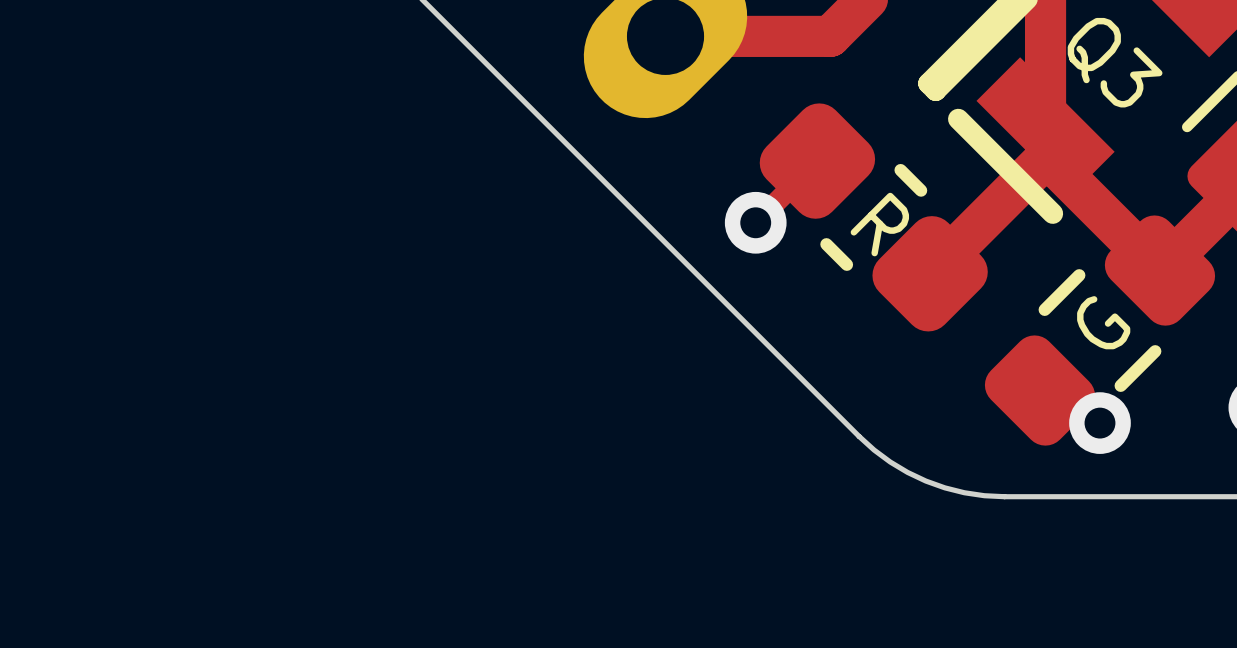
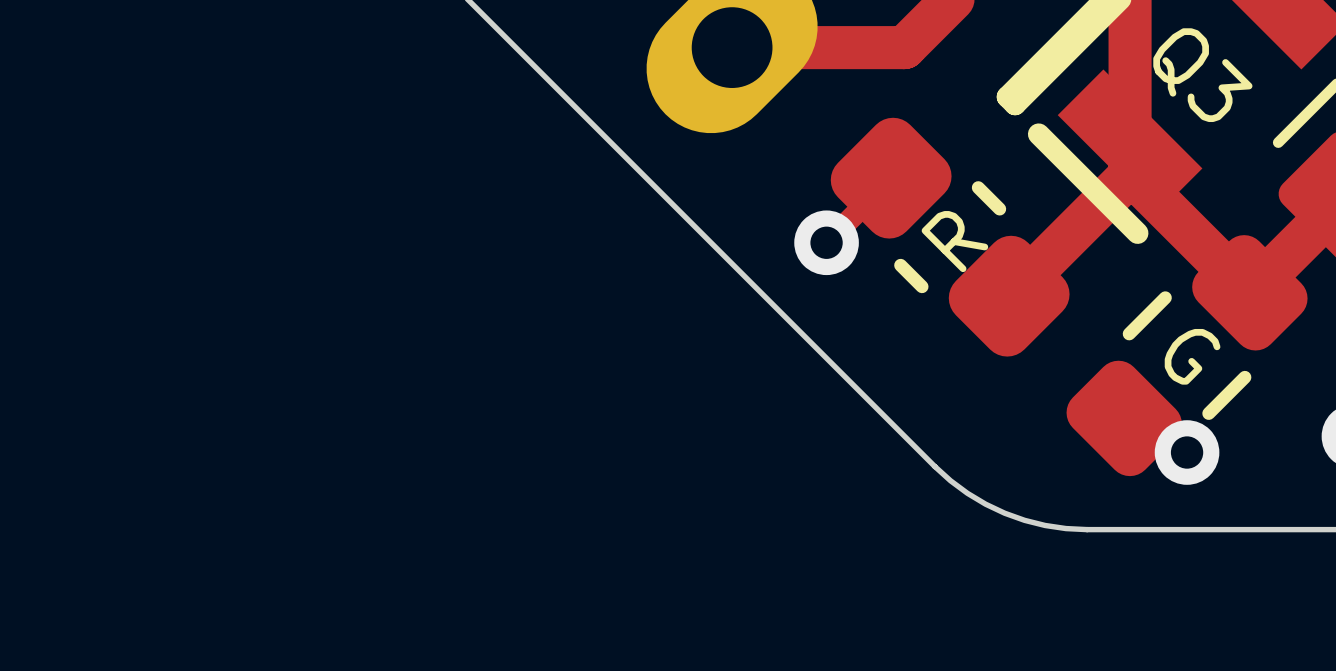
text rotation: 0° (879, 224) -> 90° counterclockwise (954, 241)
text rotation: 0° (1103, 322) -> 90° clockwise (1192, 356)

